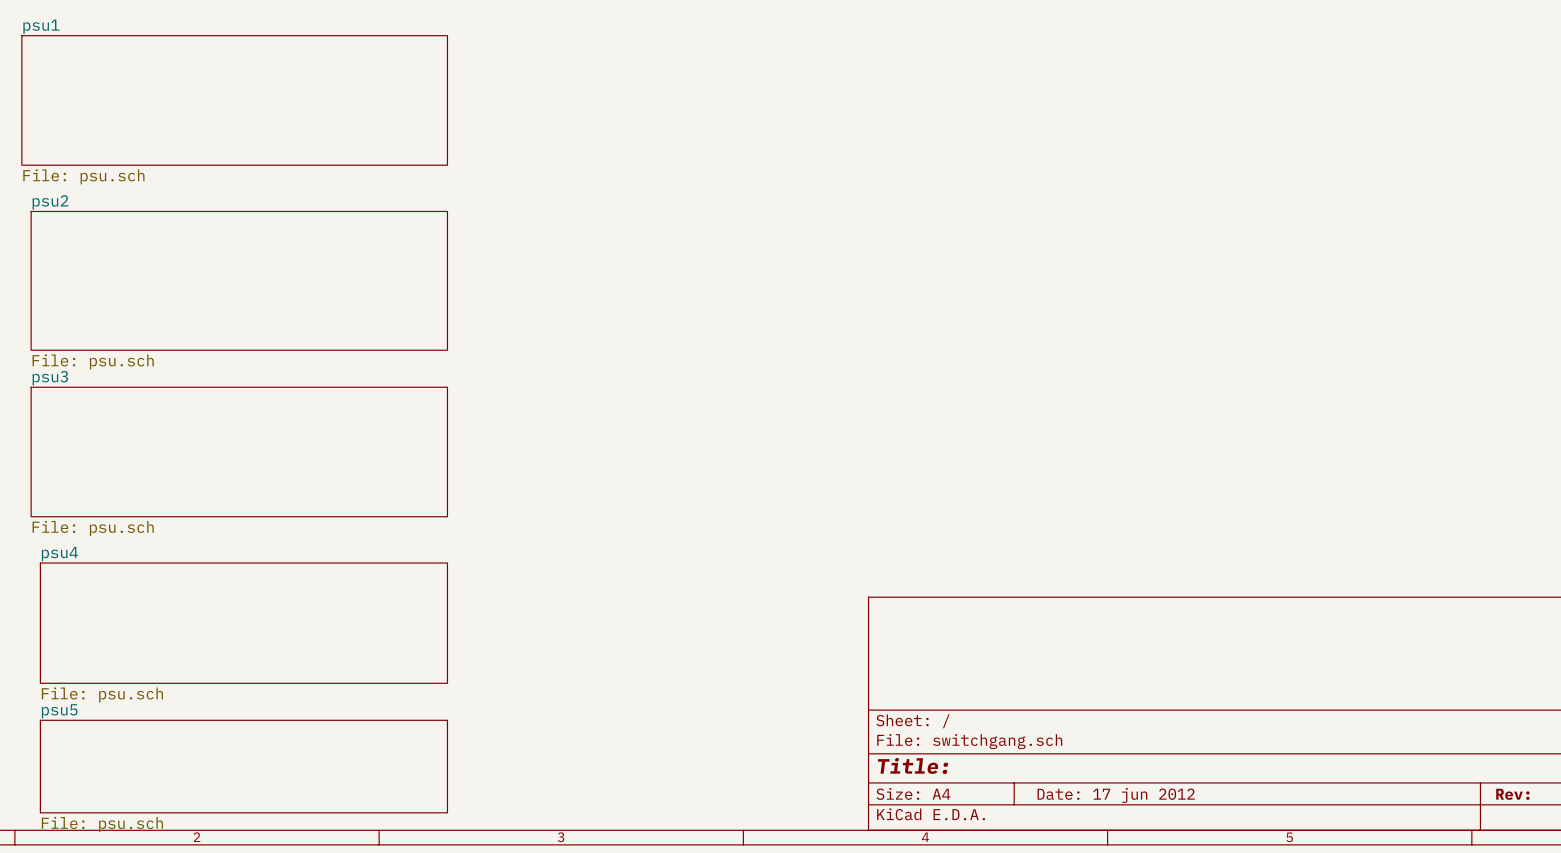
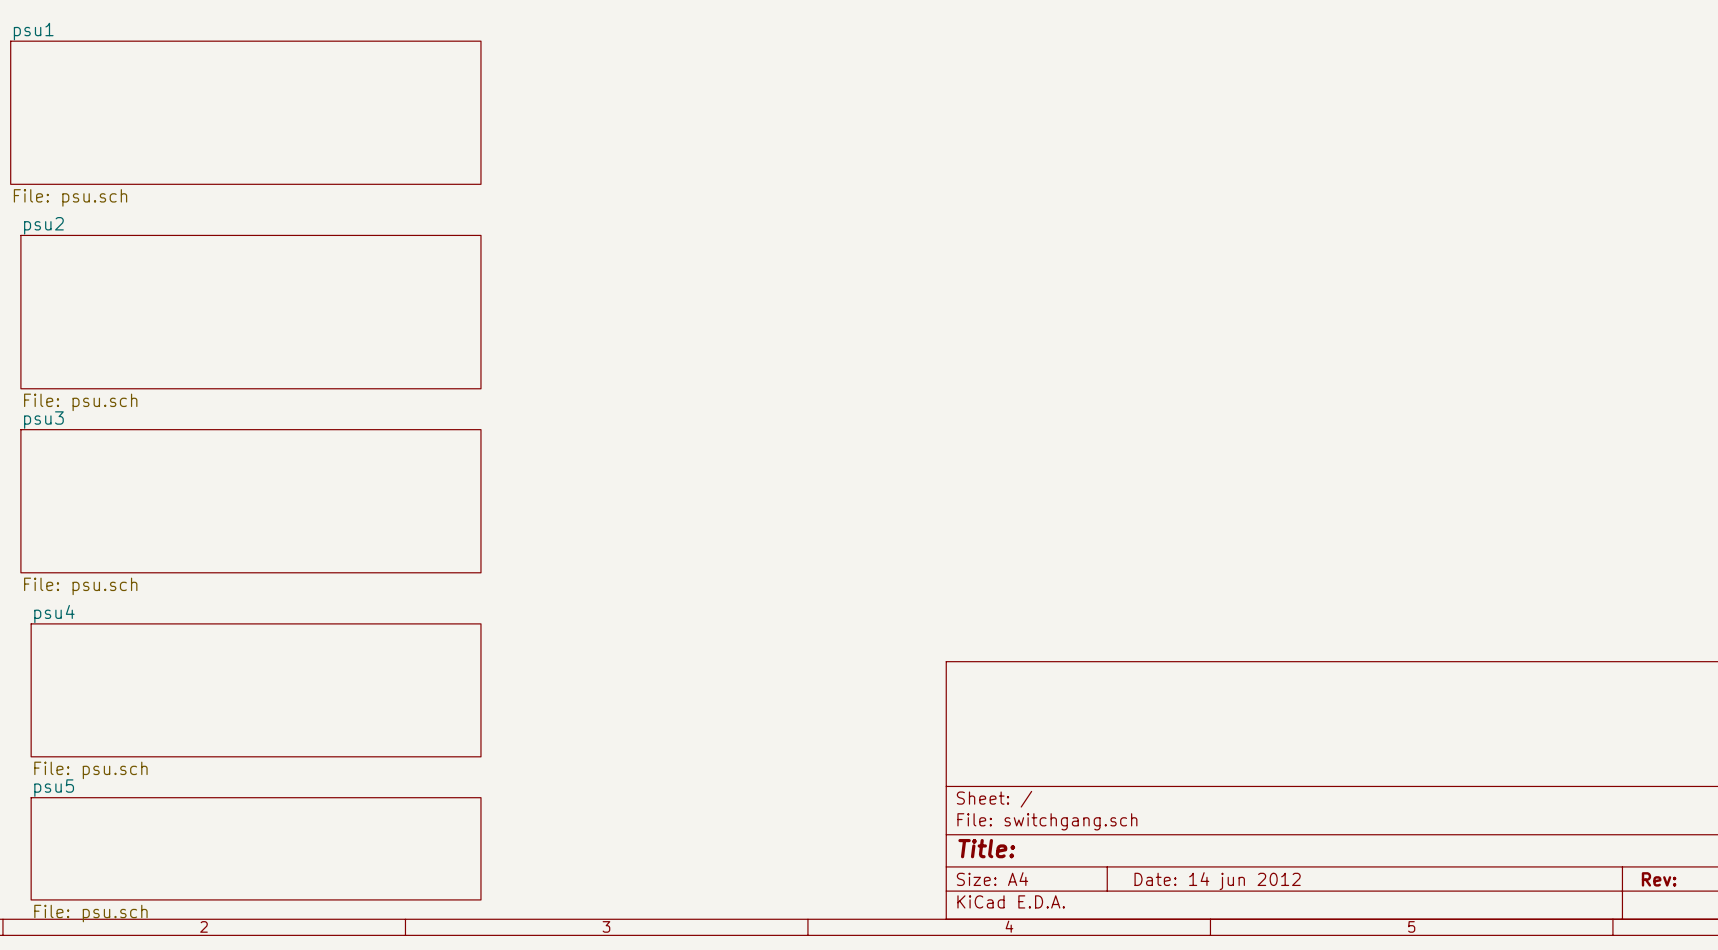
title block: Date: 17 jun 2012 (1116, 795) -> Date: 14 jun 2012 (1217, 881)

